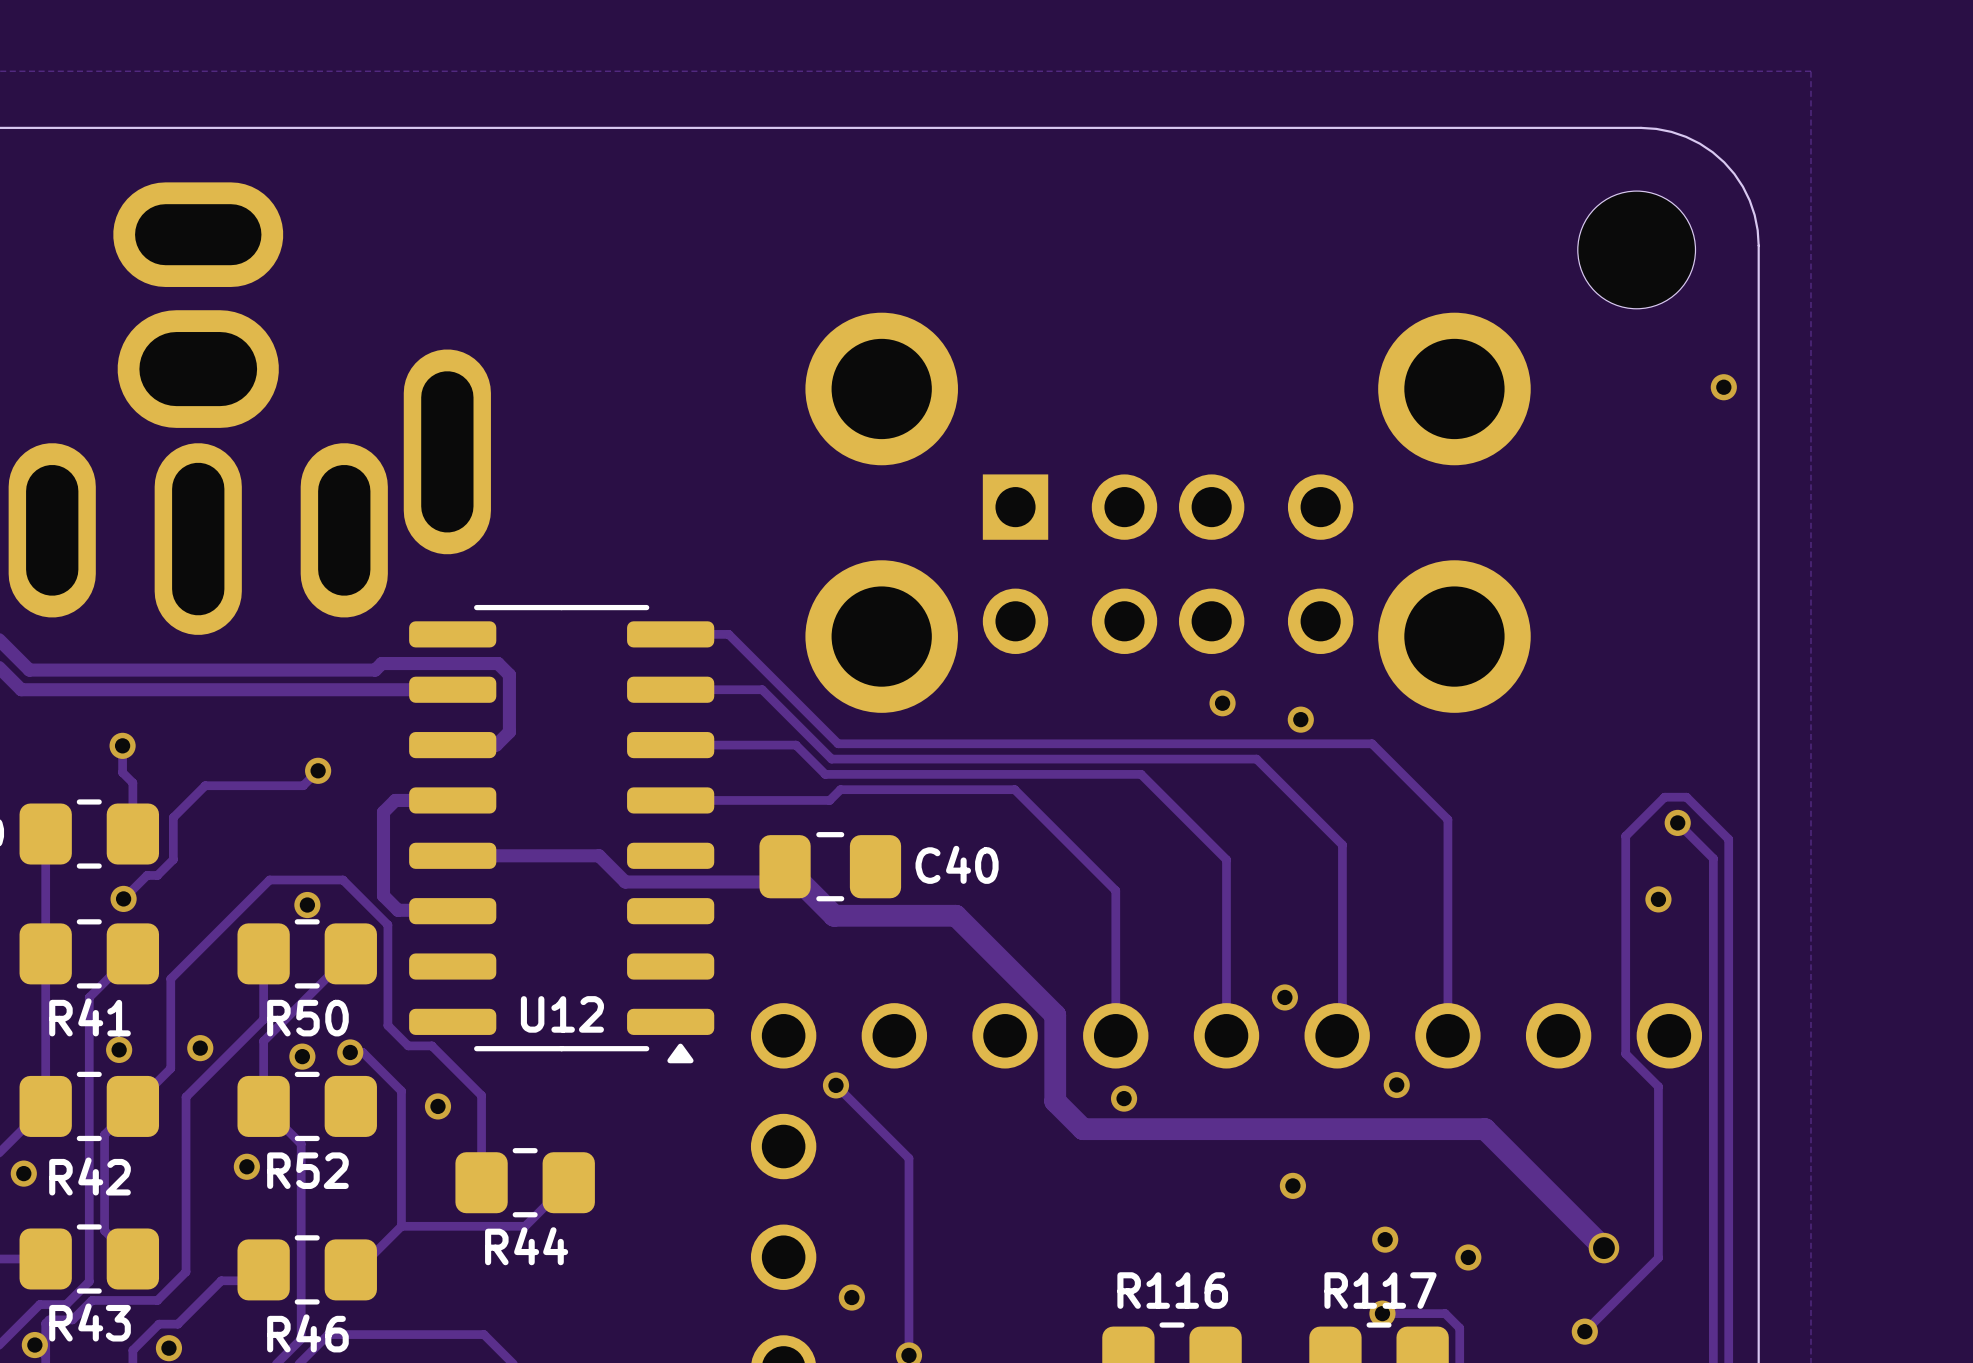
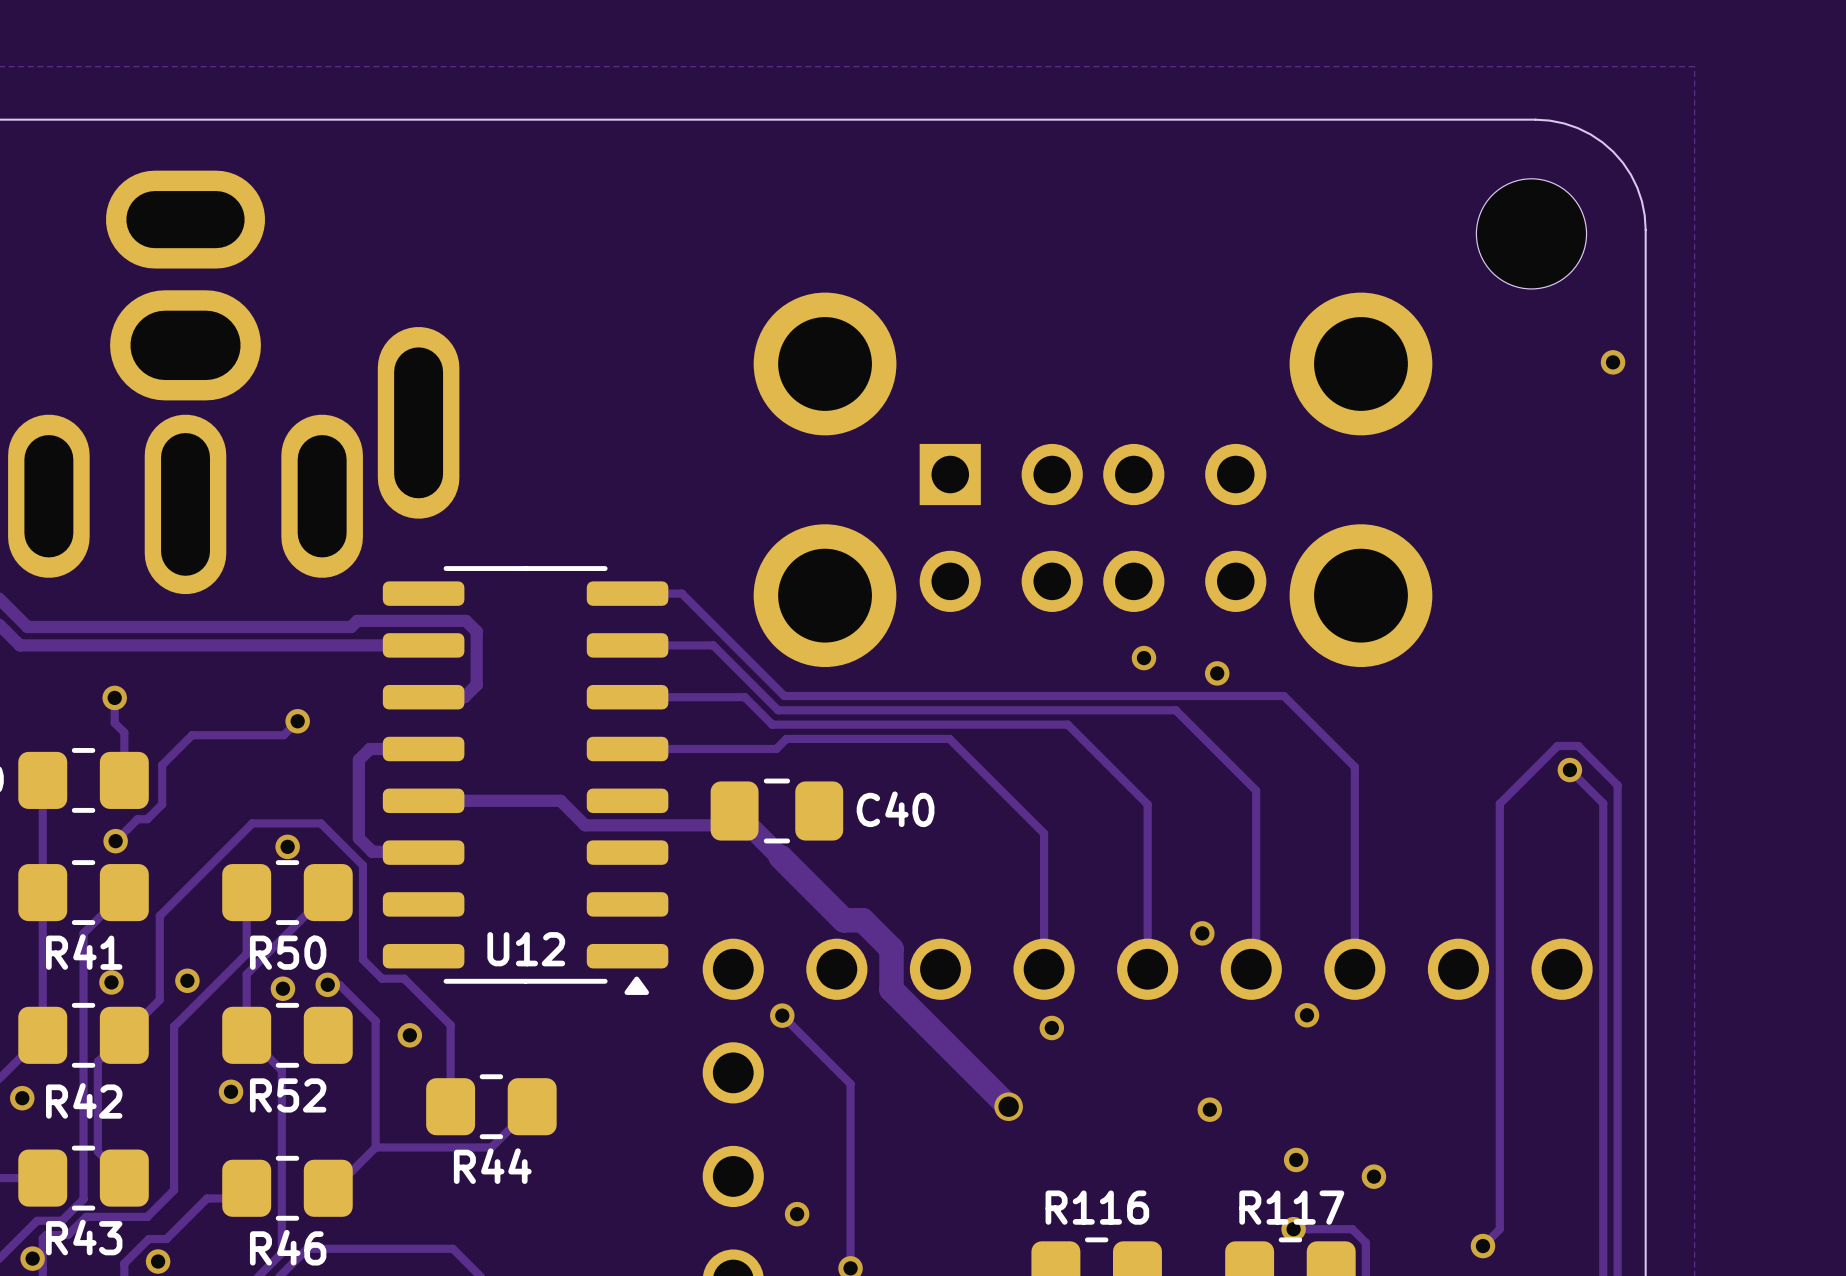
track: (1625, 836) (1625, 1053) (1658, 1086) (1658, 1258) (1602, 1313) -> (1521, 782) (1499, 803) (1499, 1229)
via: (1658, 899) -> none
track: (834, 915) (955, 915) (1055, 1015) (1055, 1101) (1083, 1129) (1485, 1129) (1603, 1248) -> (780, 856) (843, 920) (862, 920) (891, 948) (891, 989) (1008, 1106)
via: none -> (1008, 1106)
via: (1603, 1248) -> none

